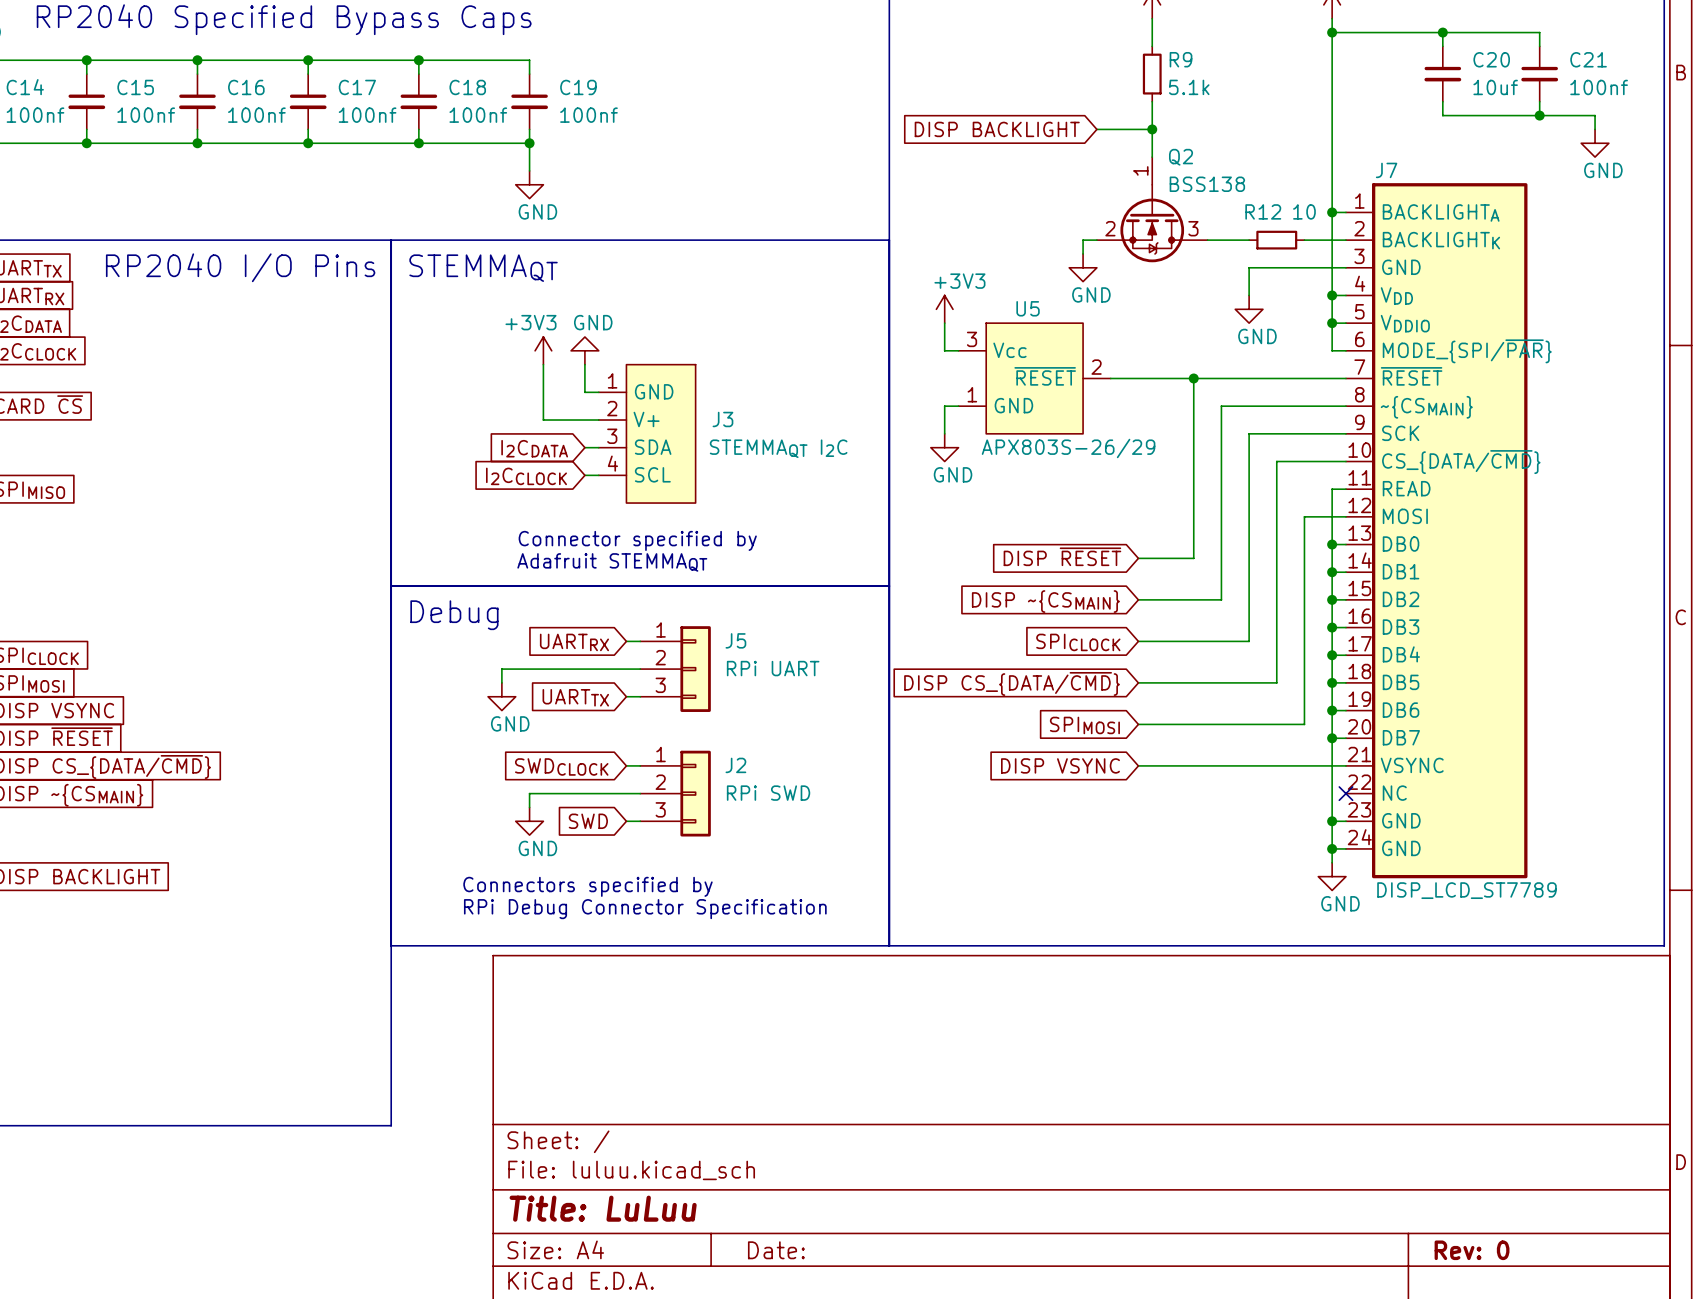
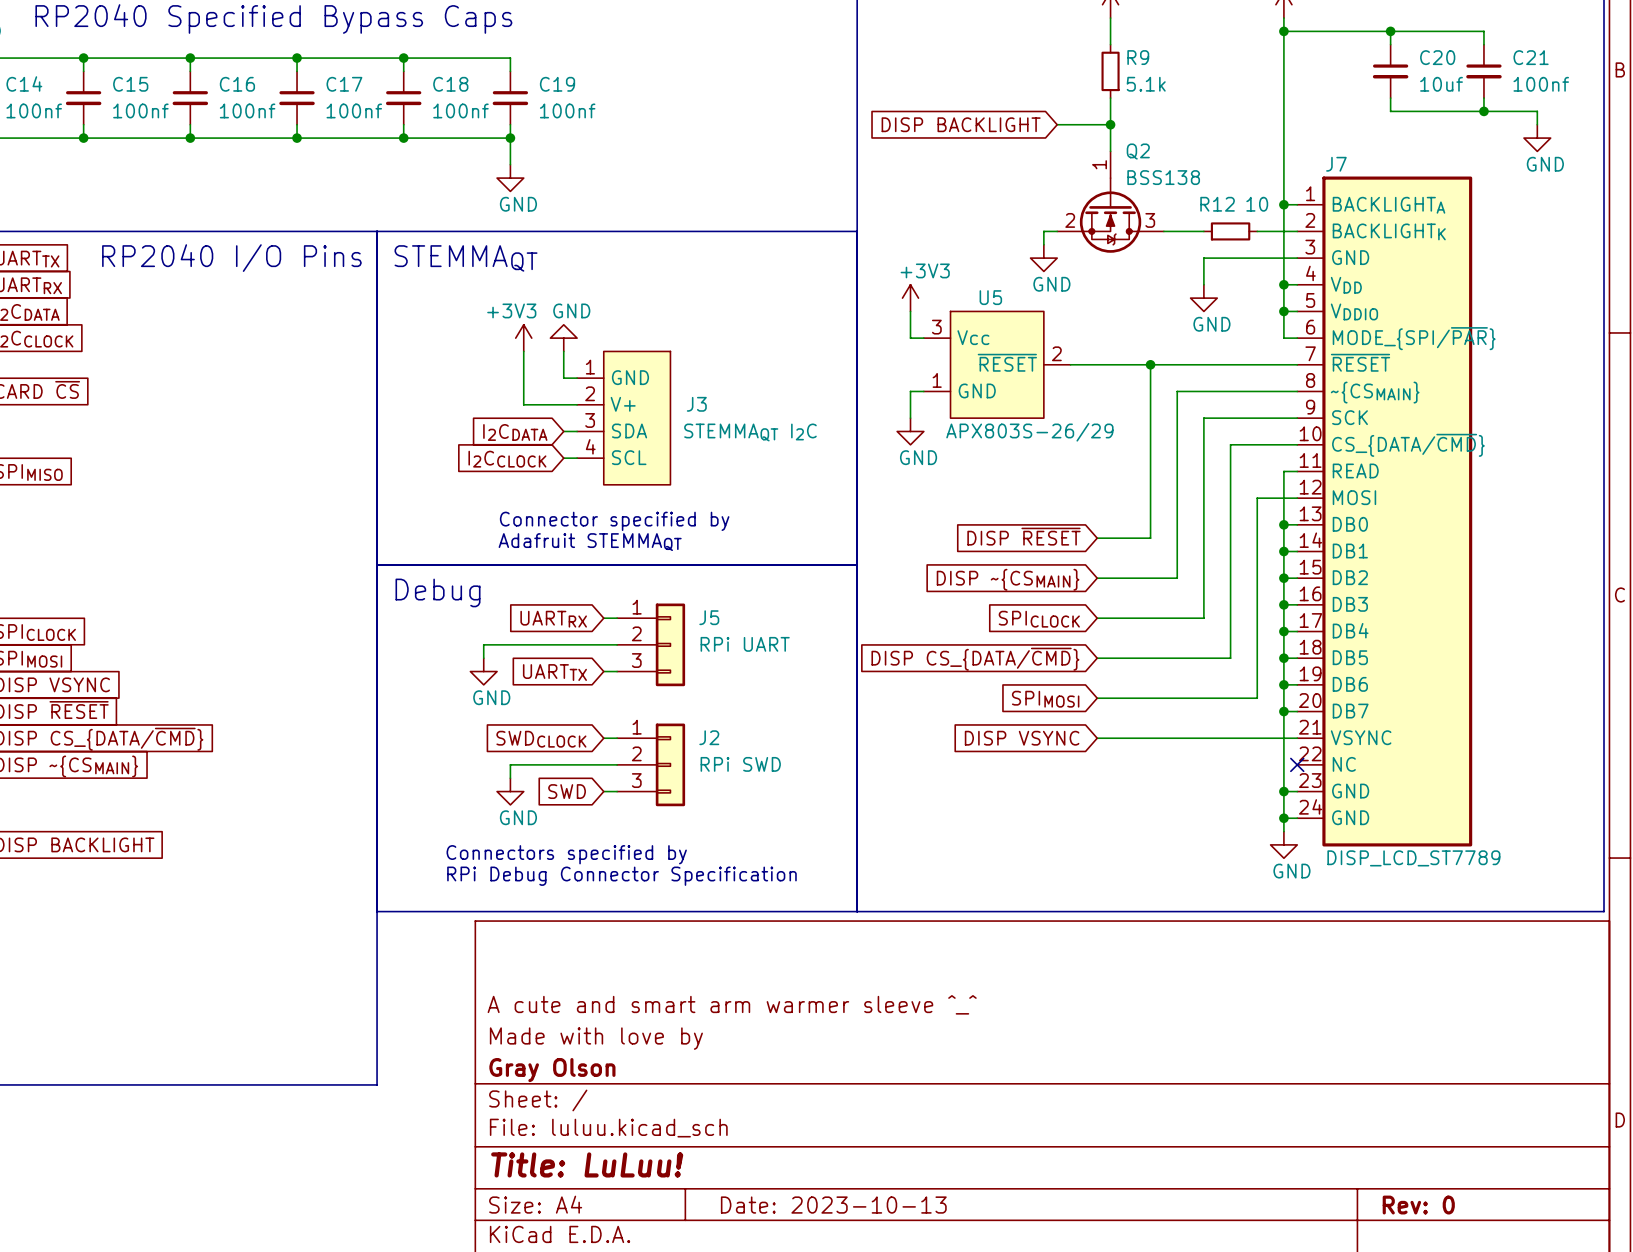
title block: none -> A cute and smart arm warmer sleeve ^_^ (732, 1004)
title block: none -> Made with love by (596, 1038)
title block: none -> Gray Olson (552, 1070)
title block: Title: LuLuu (603, 1208) -> Title: LuLuu! (587, 1164)
title block: Date: (776, 1250) -> Date: 2023-10-13 (833, 1205)

